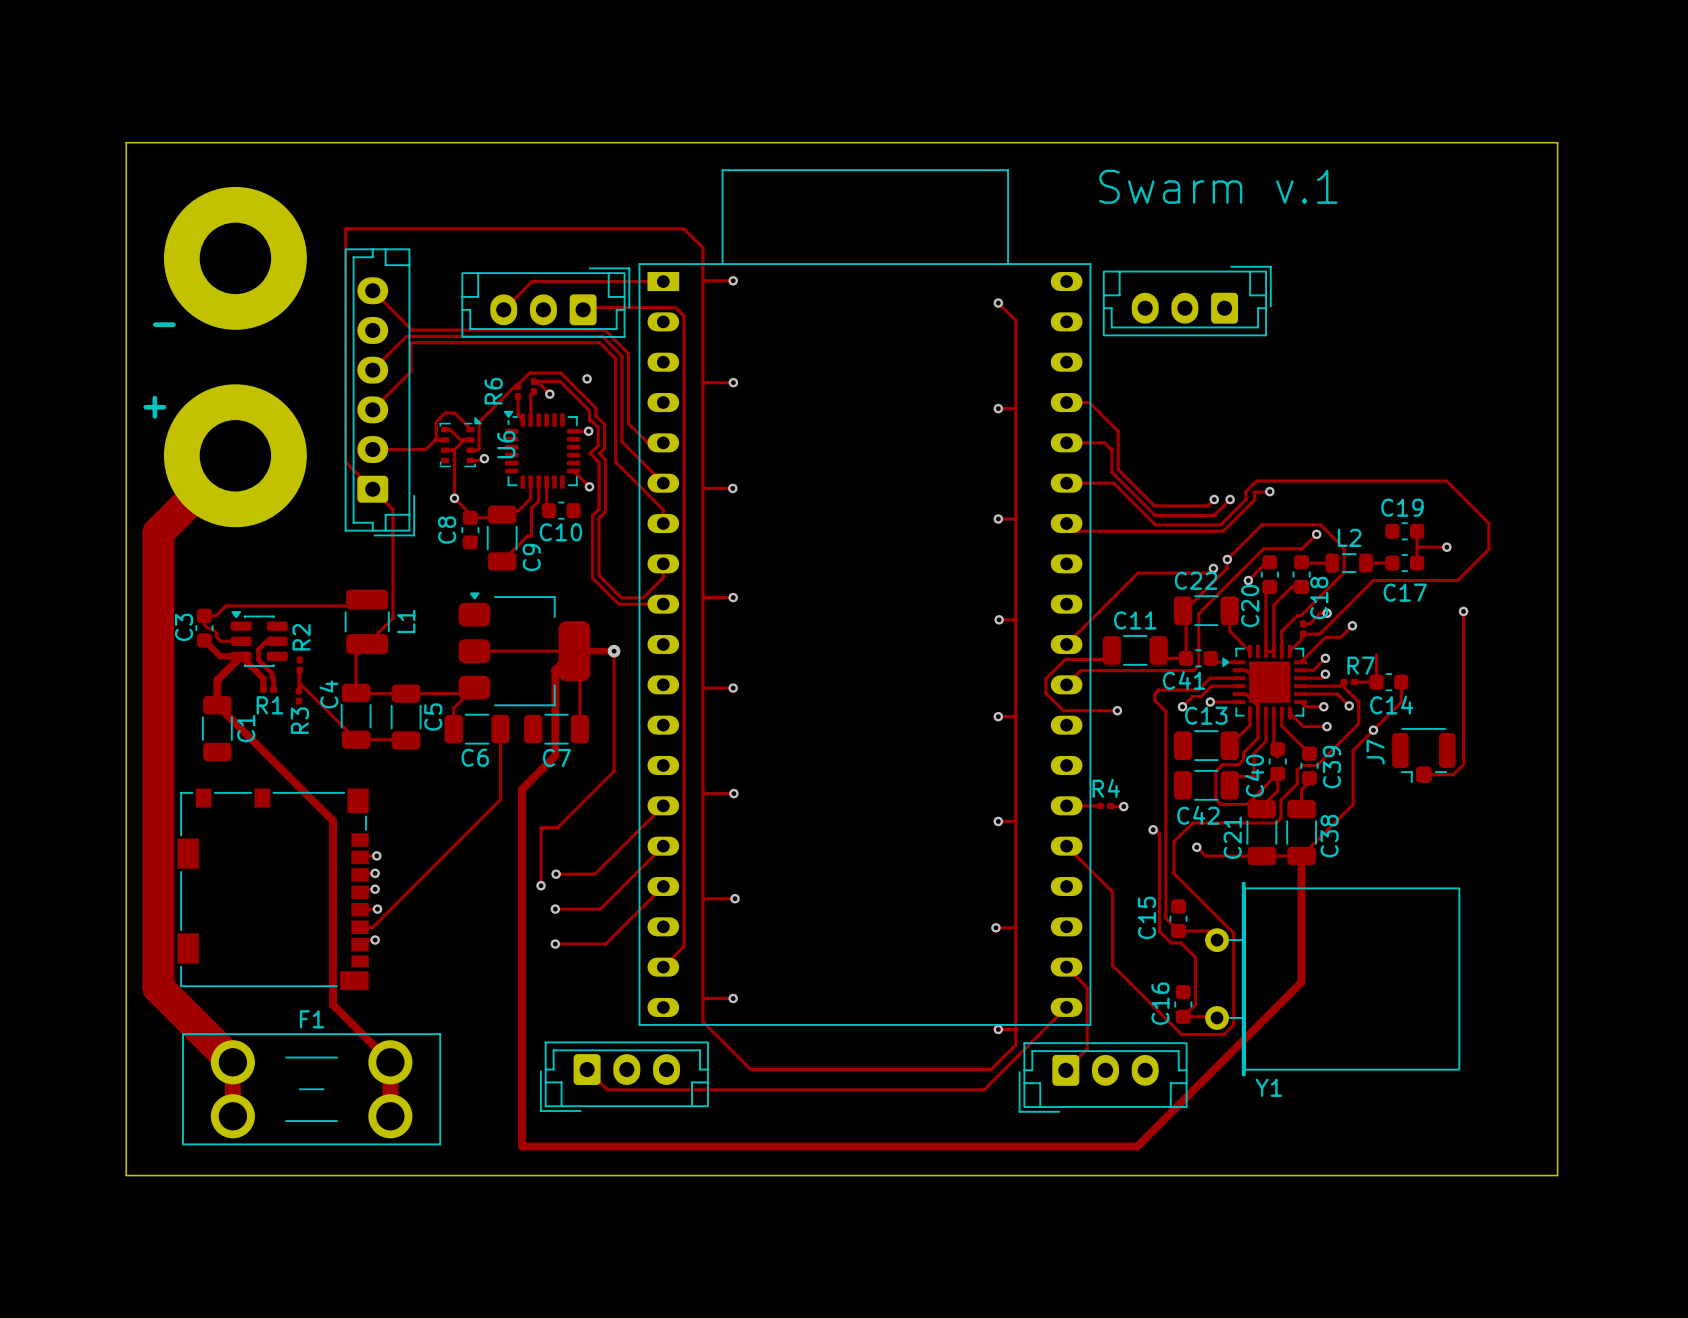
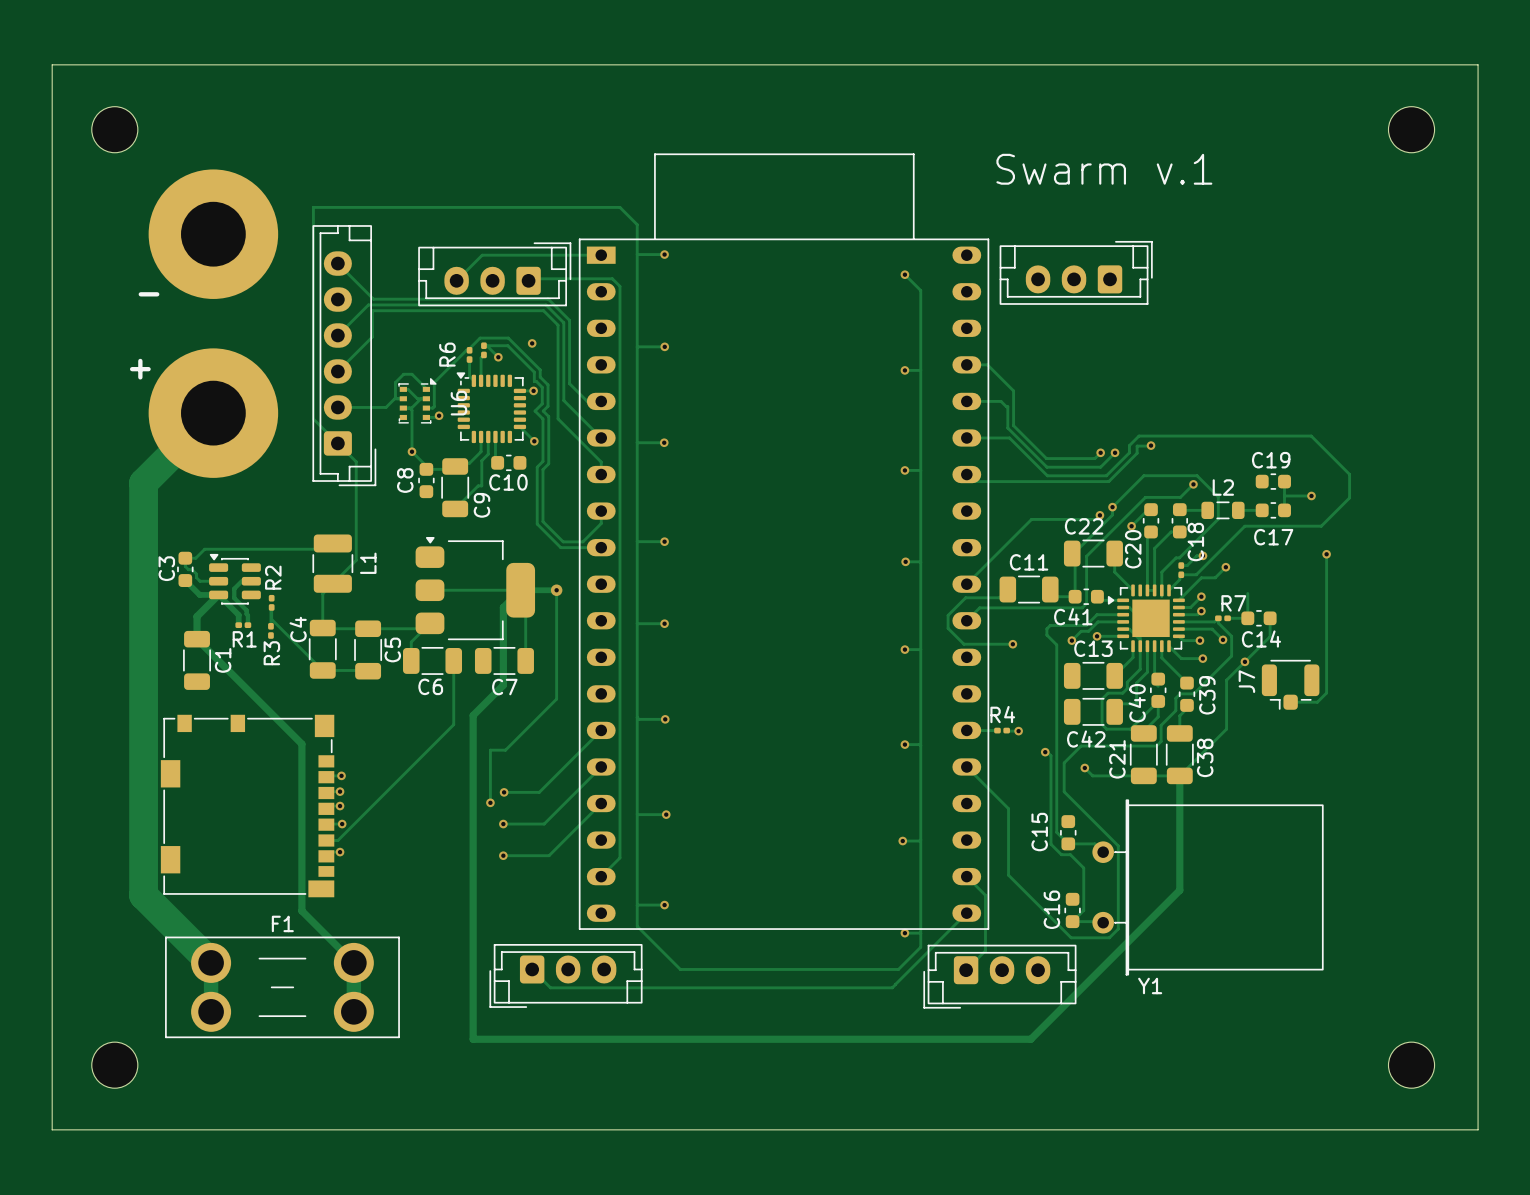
board edge: (126, 142) (1557, 142) (1557, 1175) (126, 1175) (126, 142) -> (52, 64) (52, 1129) (1478, 1129) (1478, 64) (52, 64)
part: none -> (114, 129)
part: none -> (1411, 129)
part: none -> (114, 1065)
part: none -> (1411, 1065)

